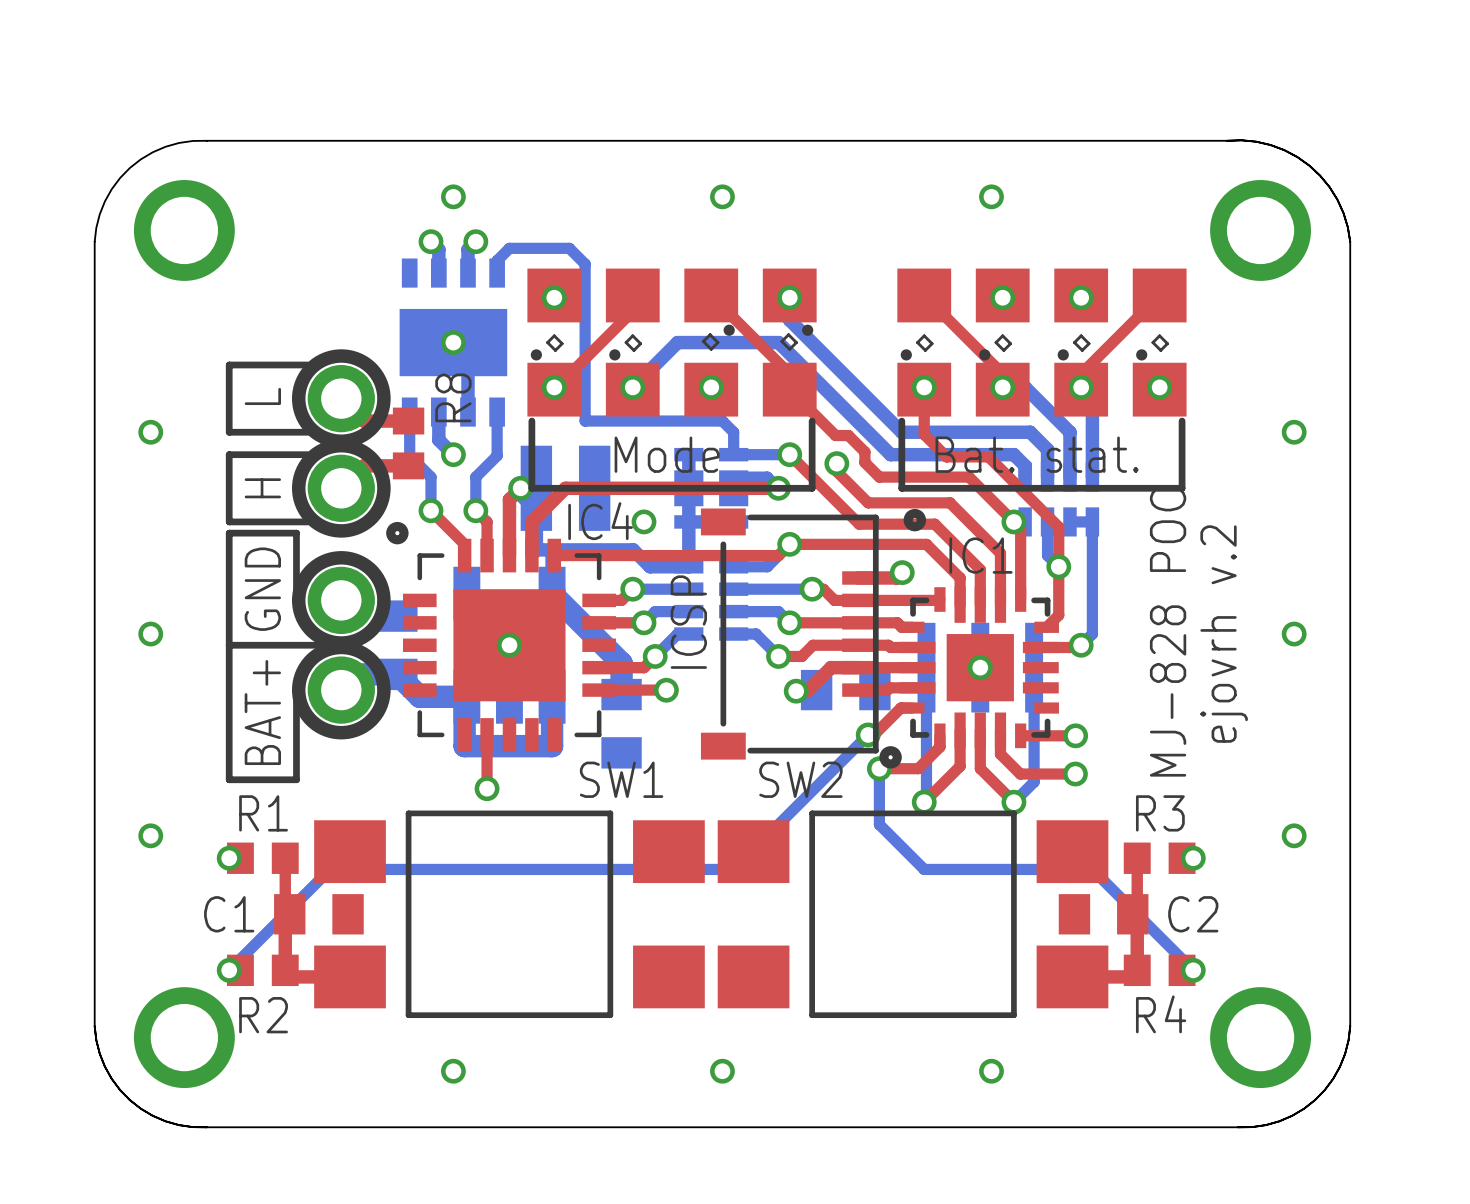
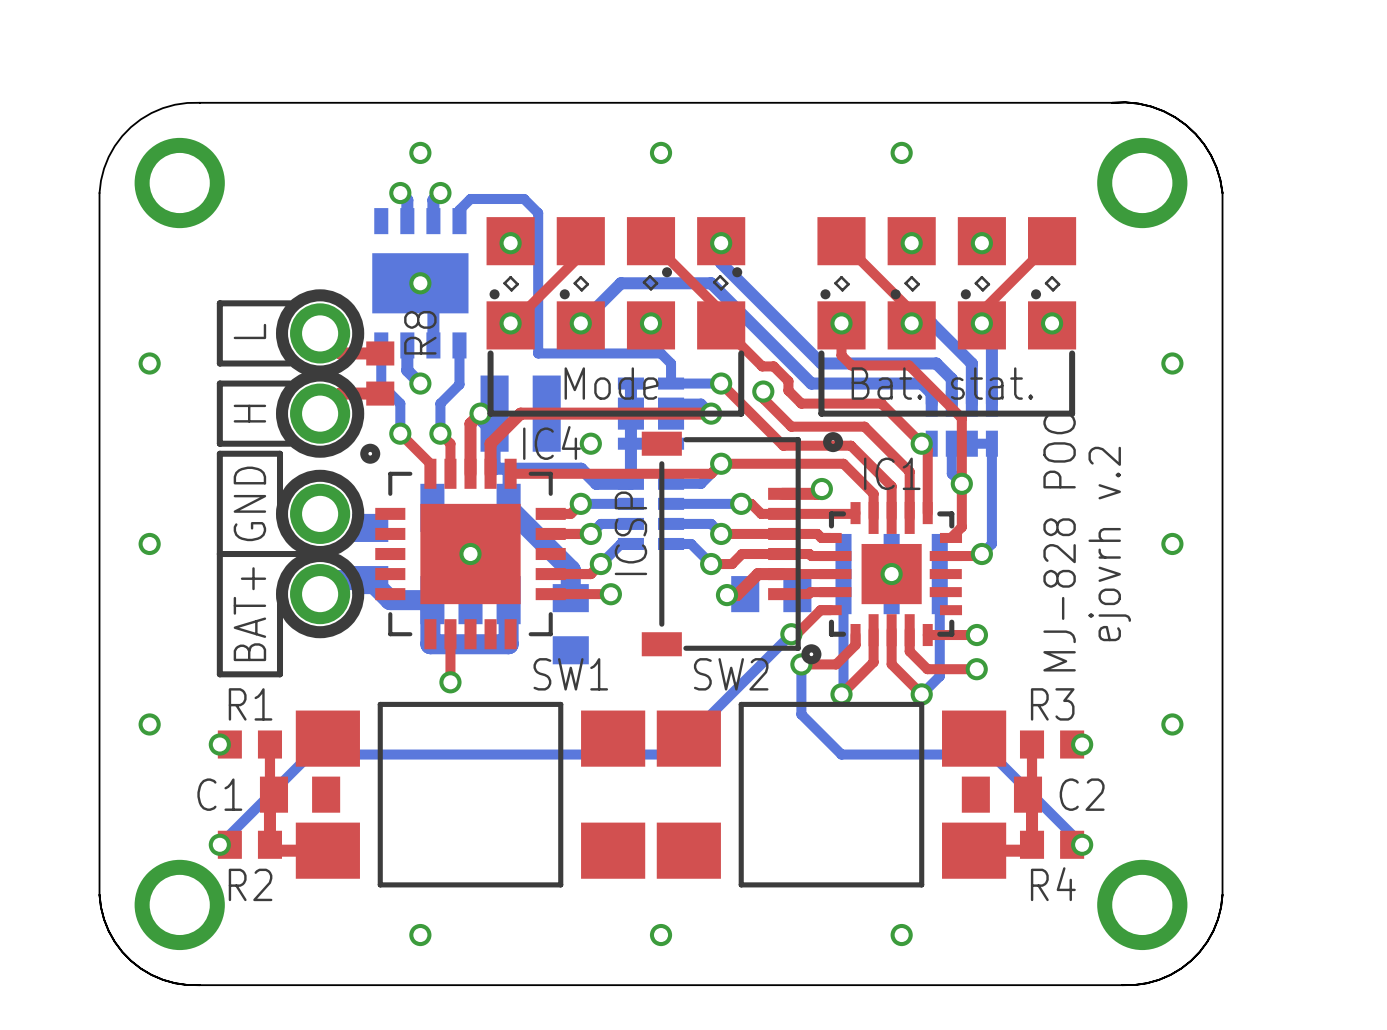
top track: (924, 423) (924, 434) (946, 456) (988, 456) (1058, 527) -> (841, 355) (851, 365) (909, 365) (961, 418) (961, 448)

